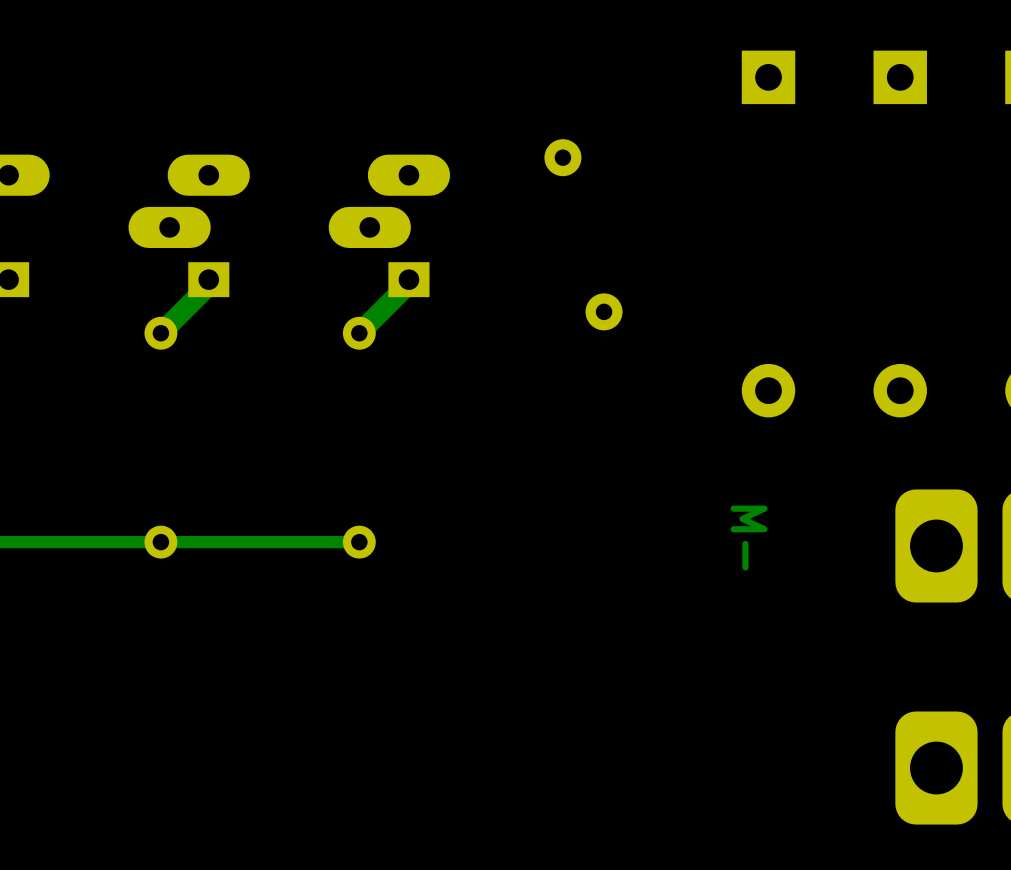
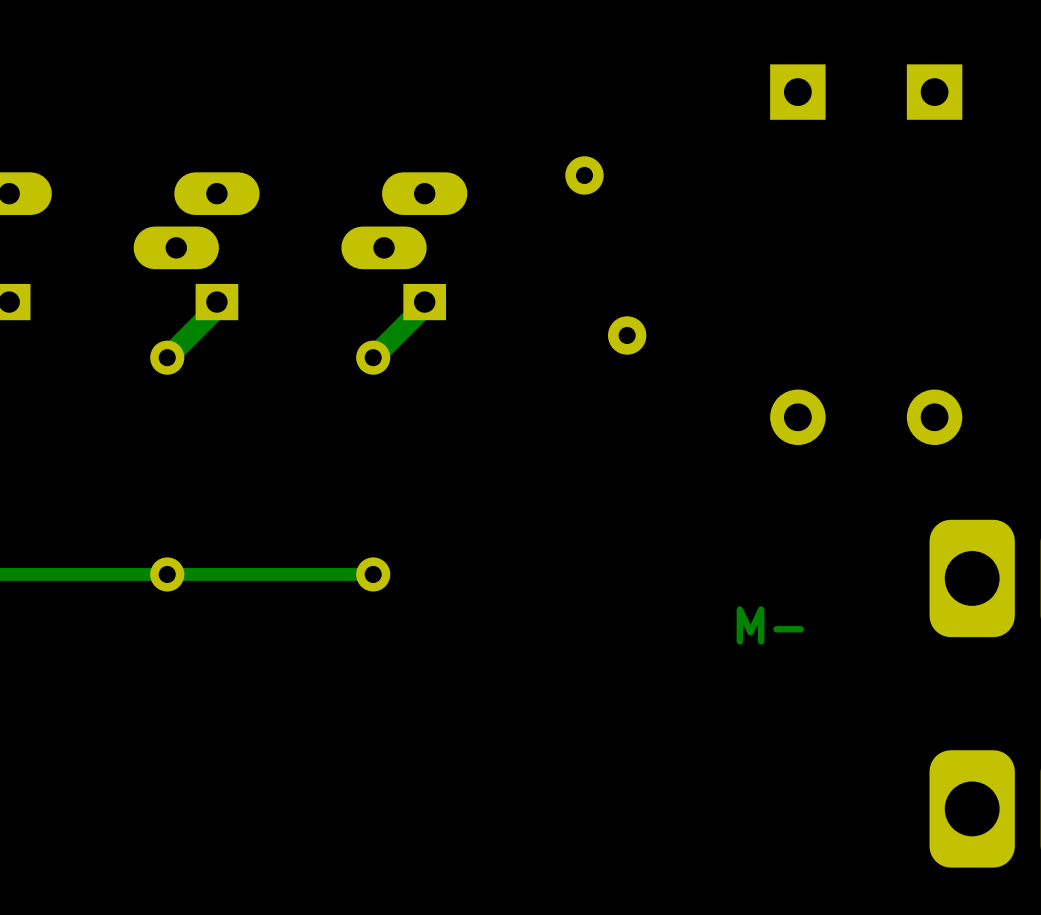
text rotation: 0° (749, 538) -> 90° counterclockwise (770, 625)

